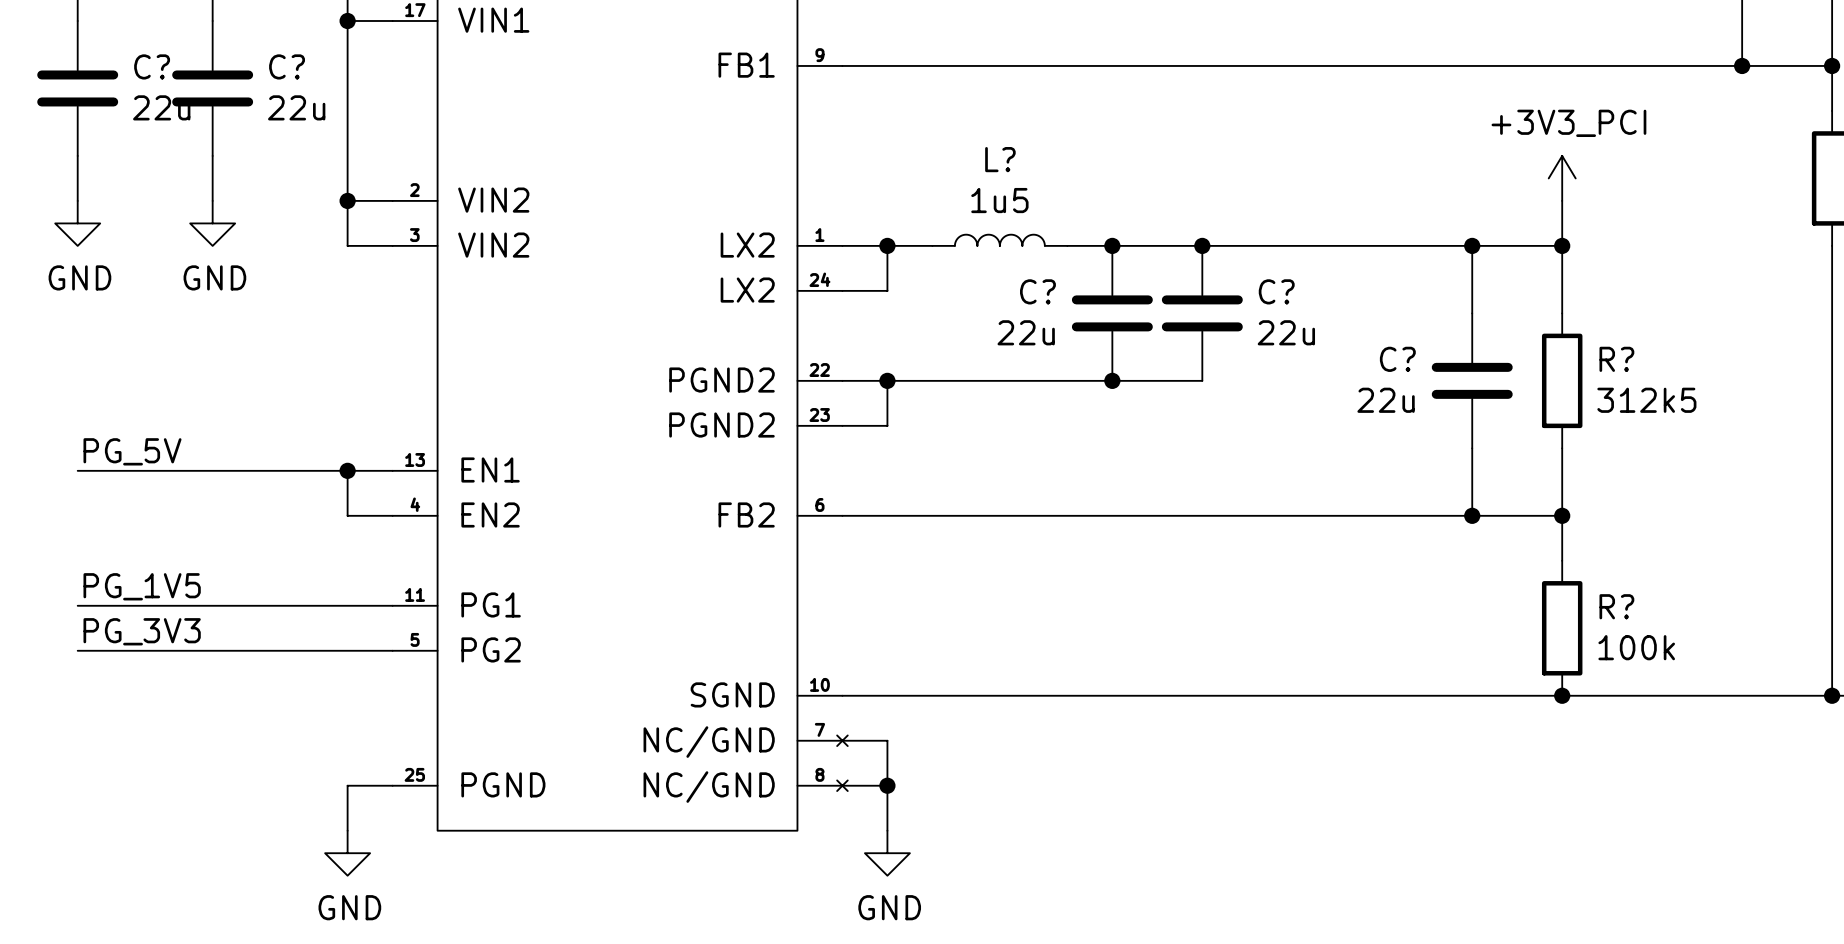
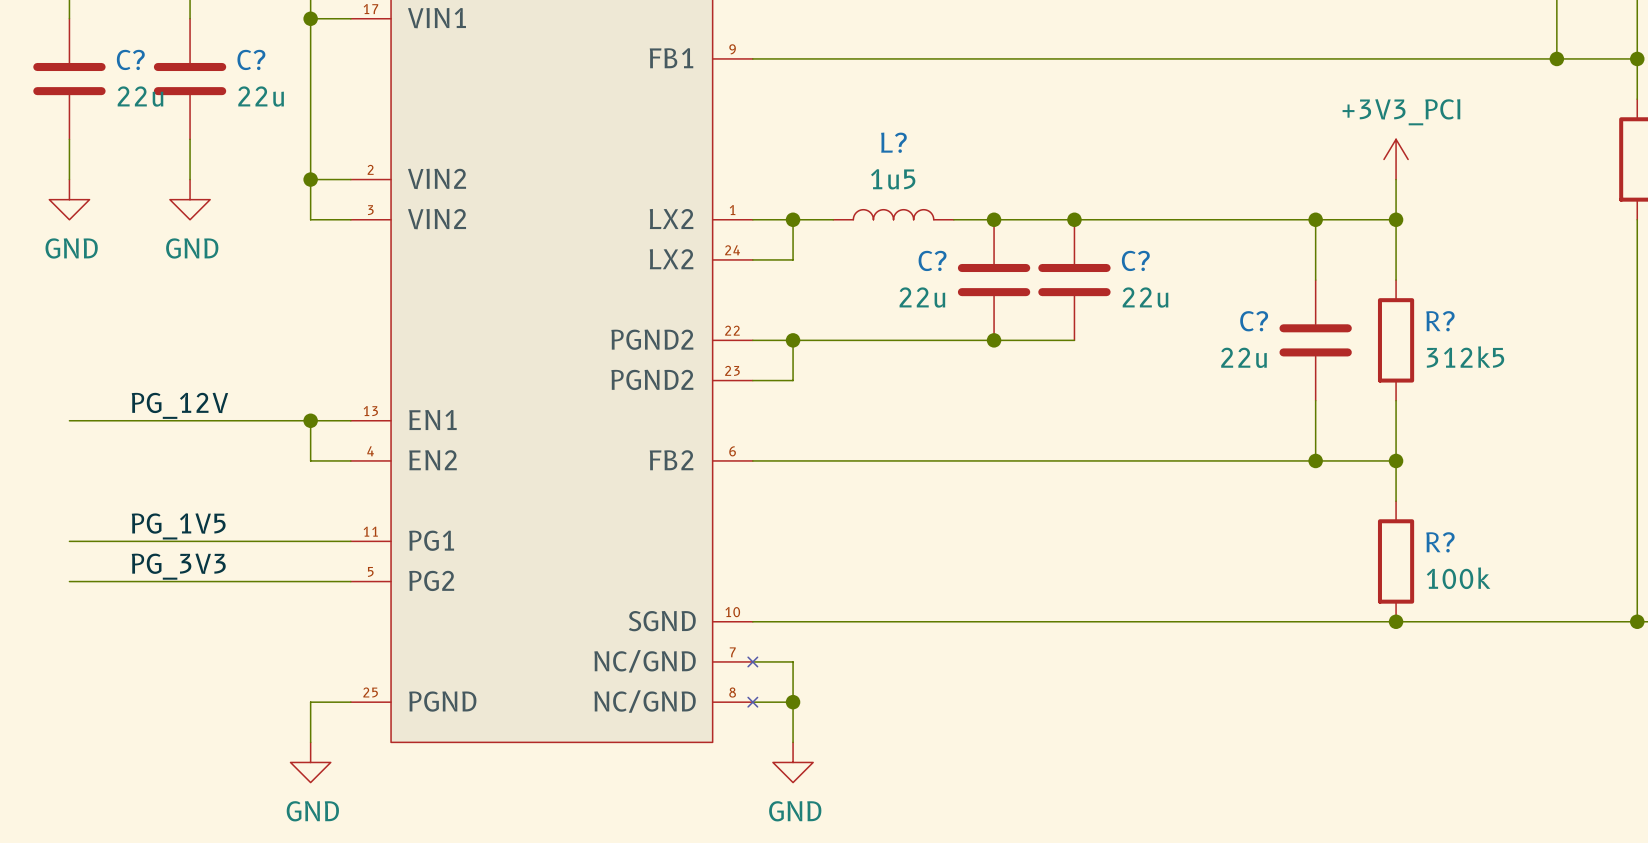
label: PG_5V (132, 451) -> PG_12V (179, 405)
label position: PG_1V5 (142, 586) -> PG_1V5 (178, 526)
label position: PG_3V3 (142, 631) -> PG_3V3 (178, 566)

